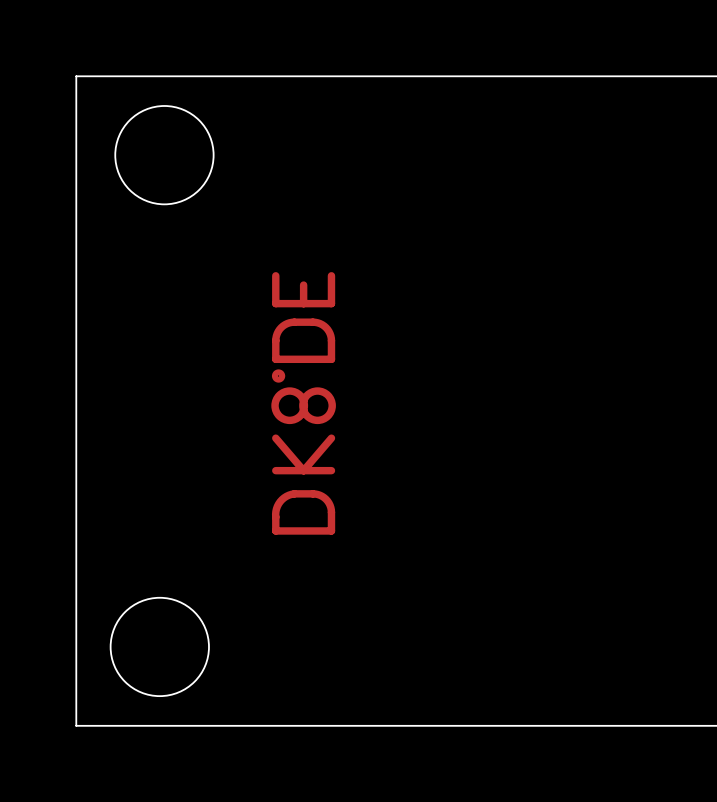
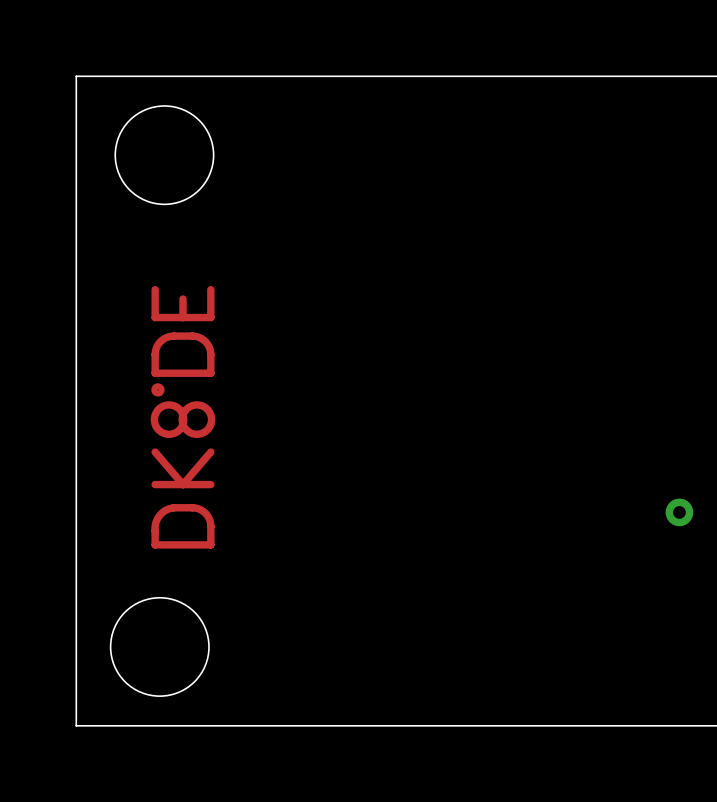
drawing position: (303, 403) -> (183, 417)
via: none -> (679, 512)

